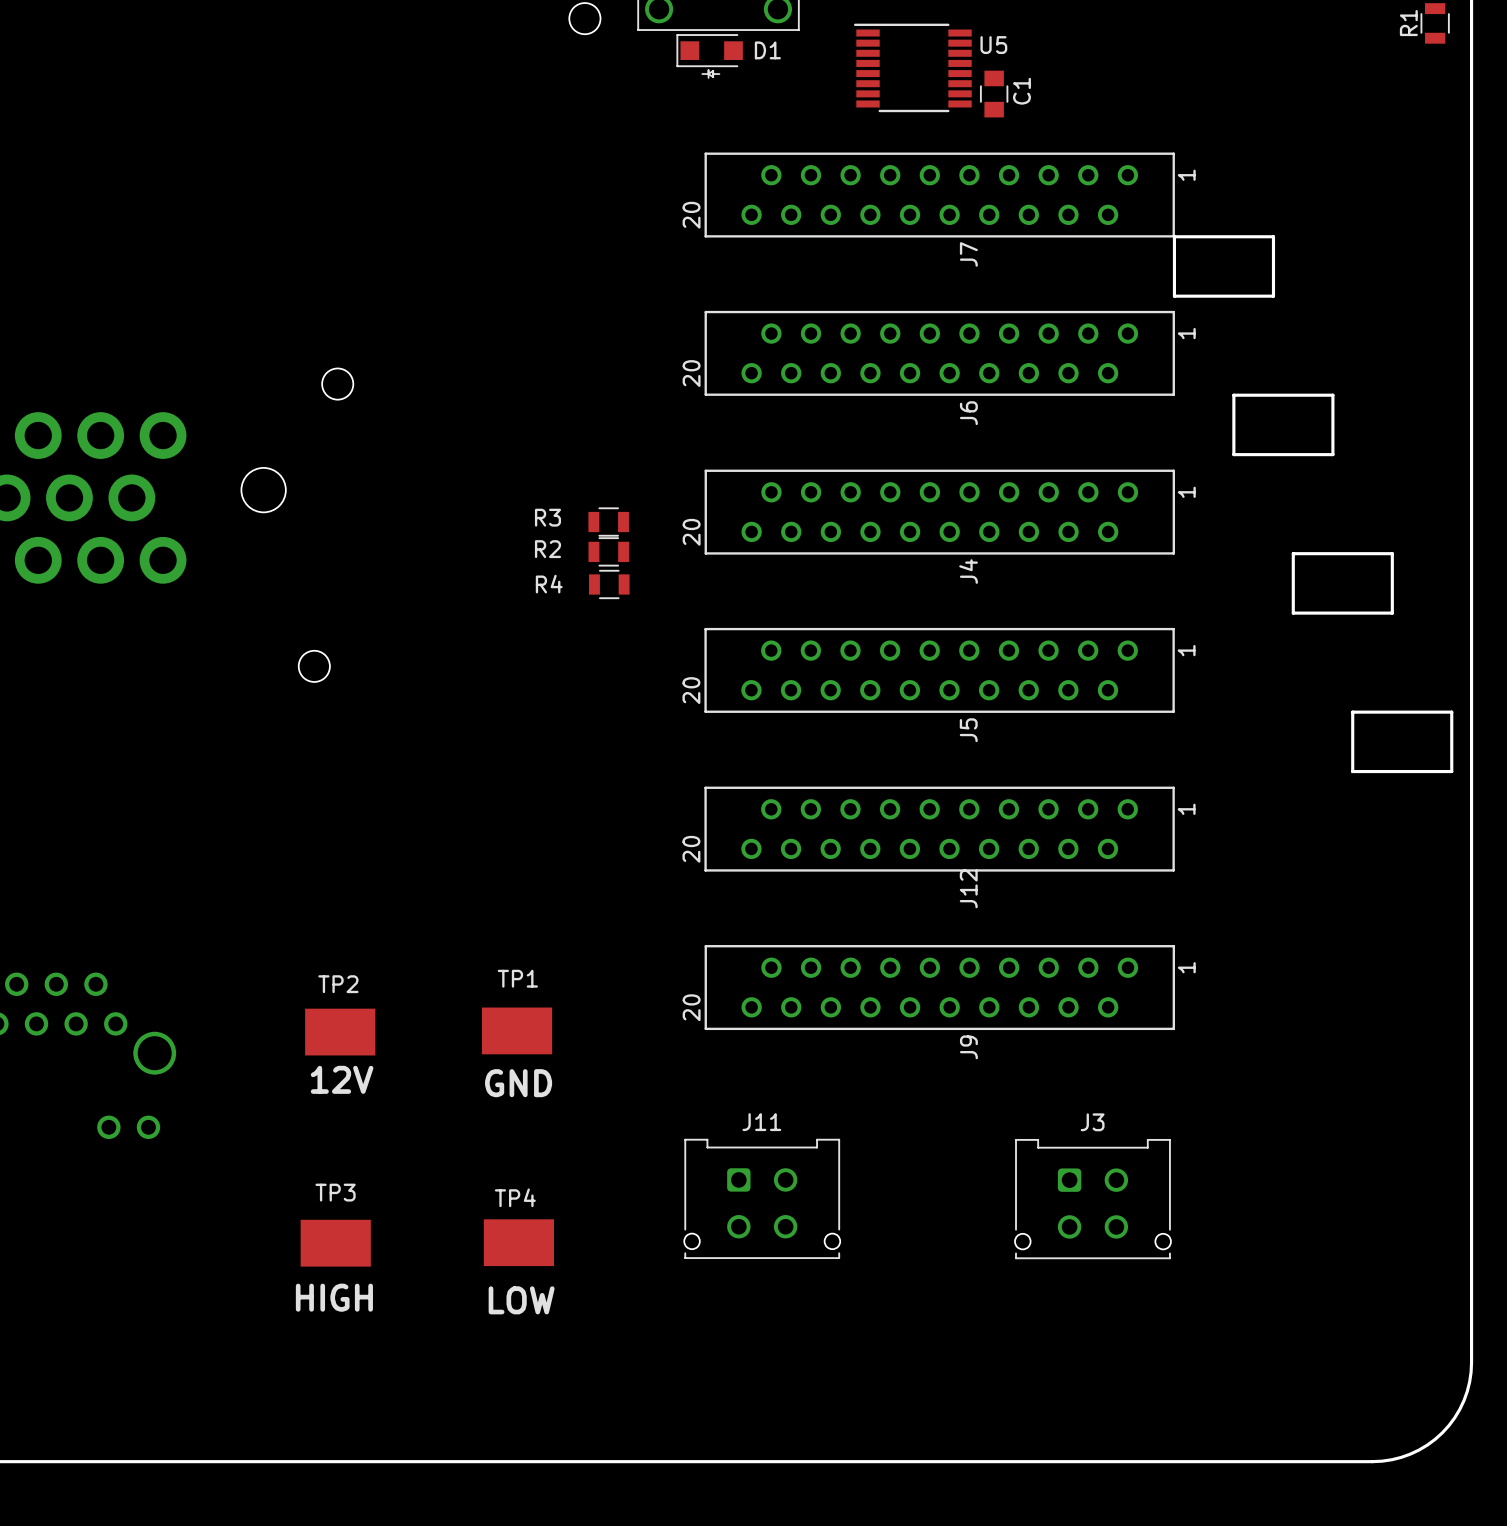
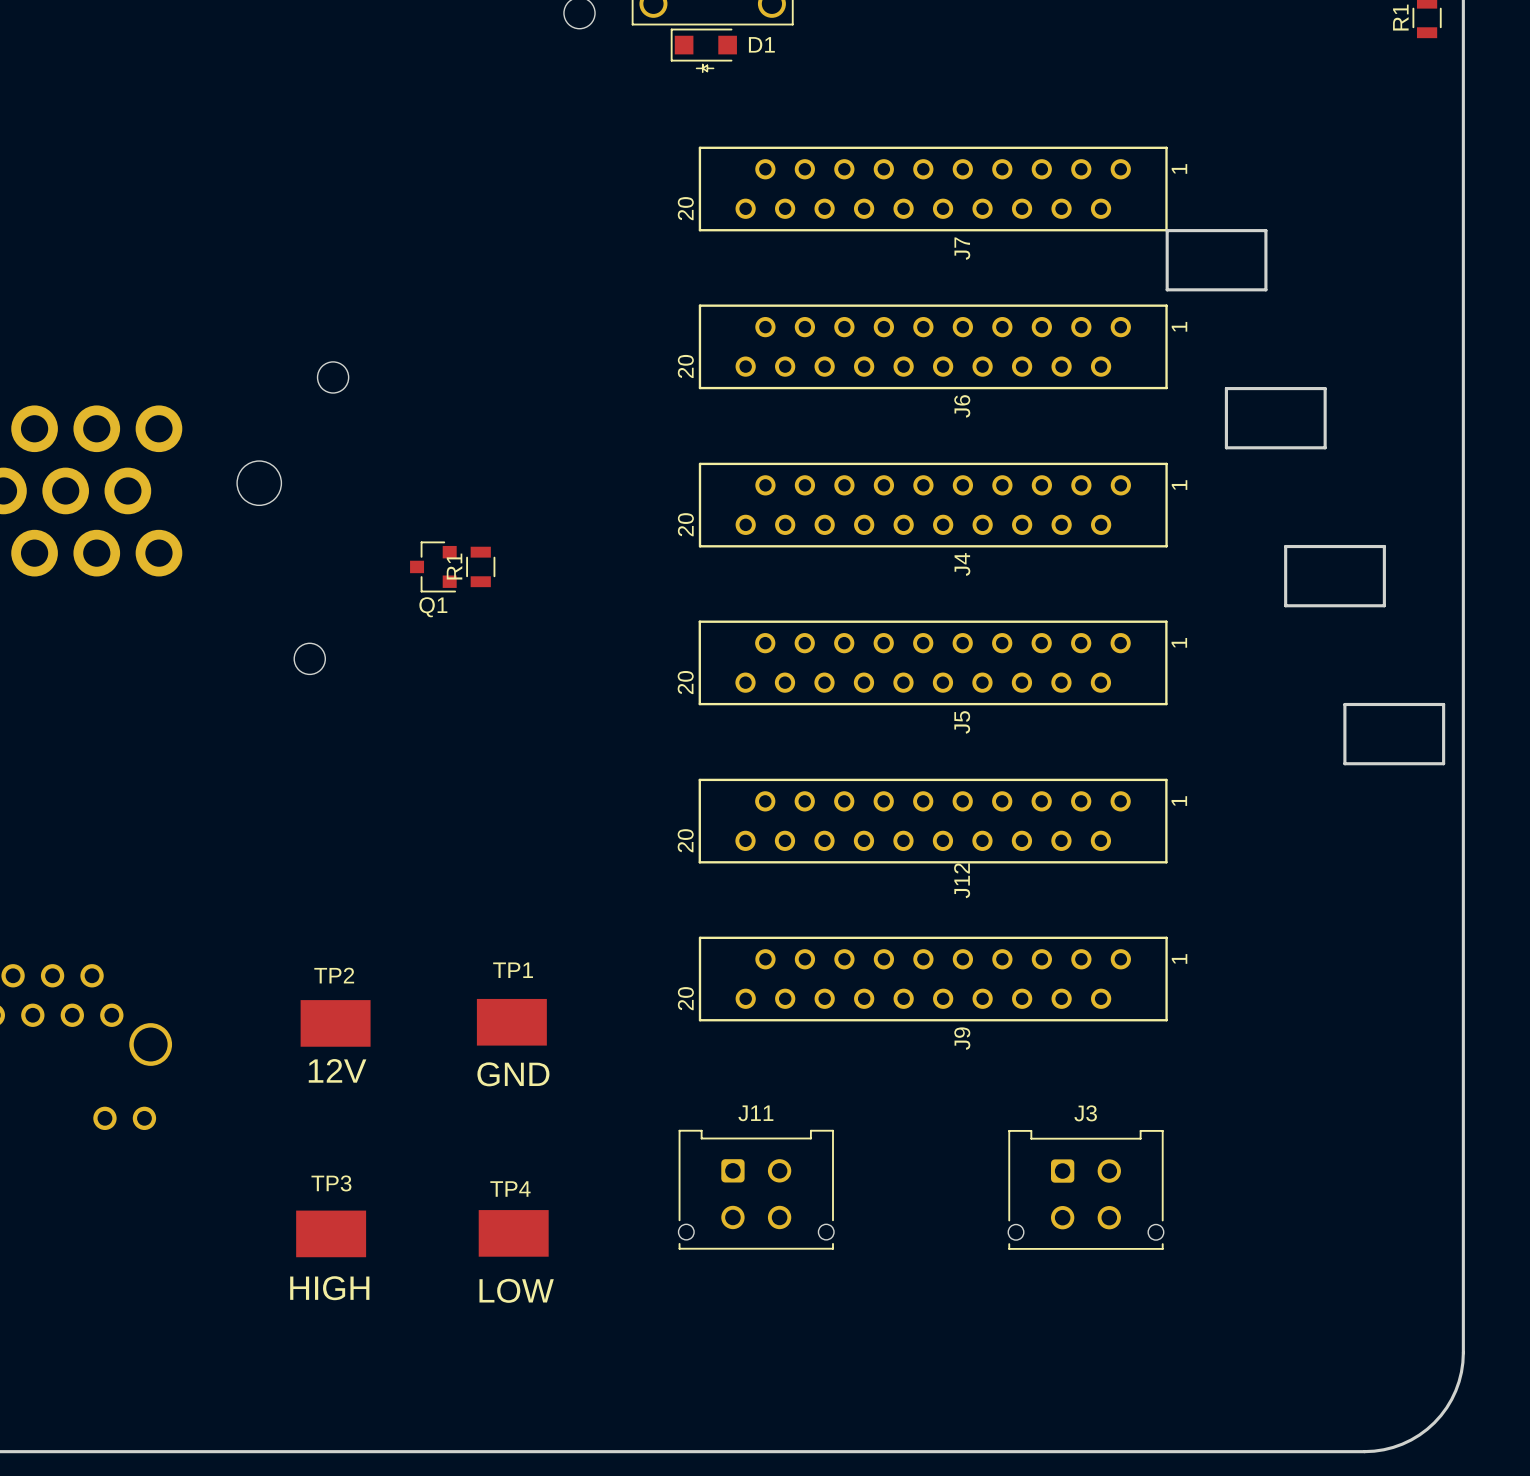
U5: (912, 67) -> none
C1: (994, 94) -> none
R2: (608, 522) -> none
R3: (608, 551) -> none
Q1: none -> (433, 566)
R1: none -> (480, 566)
R4: (609, 584) -> none

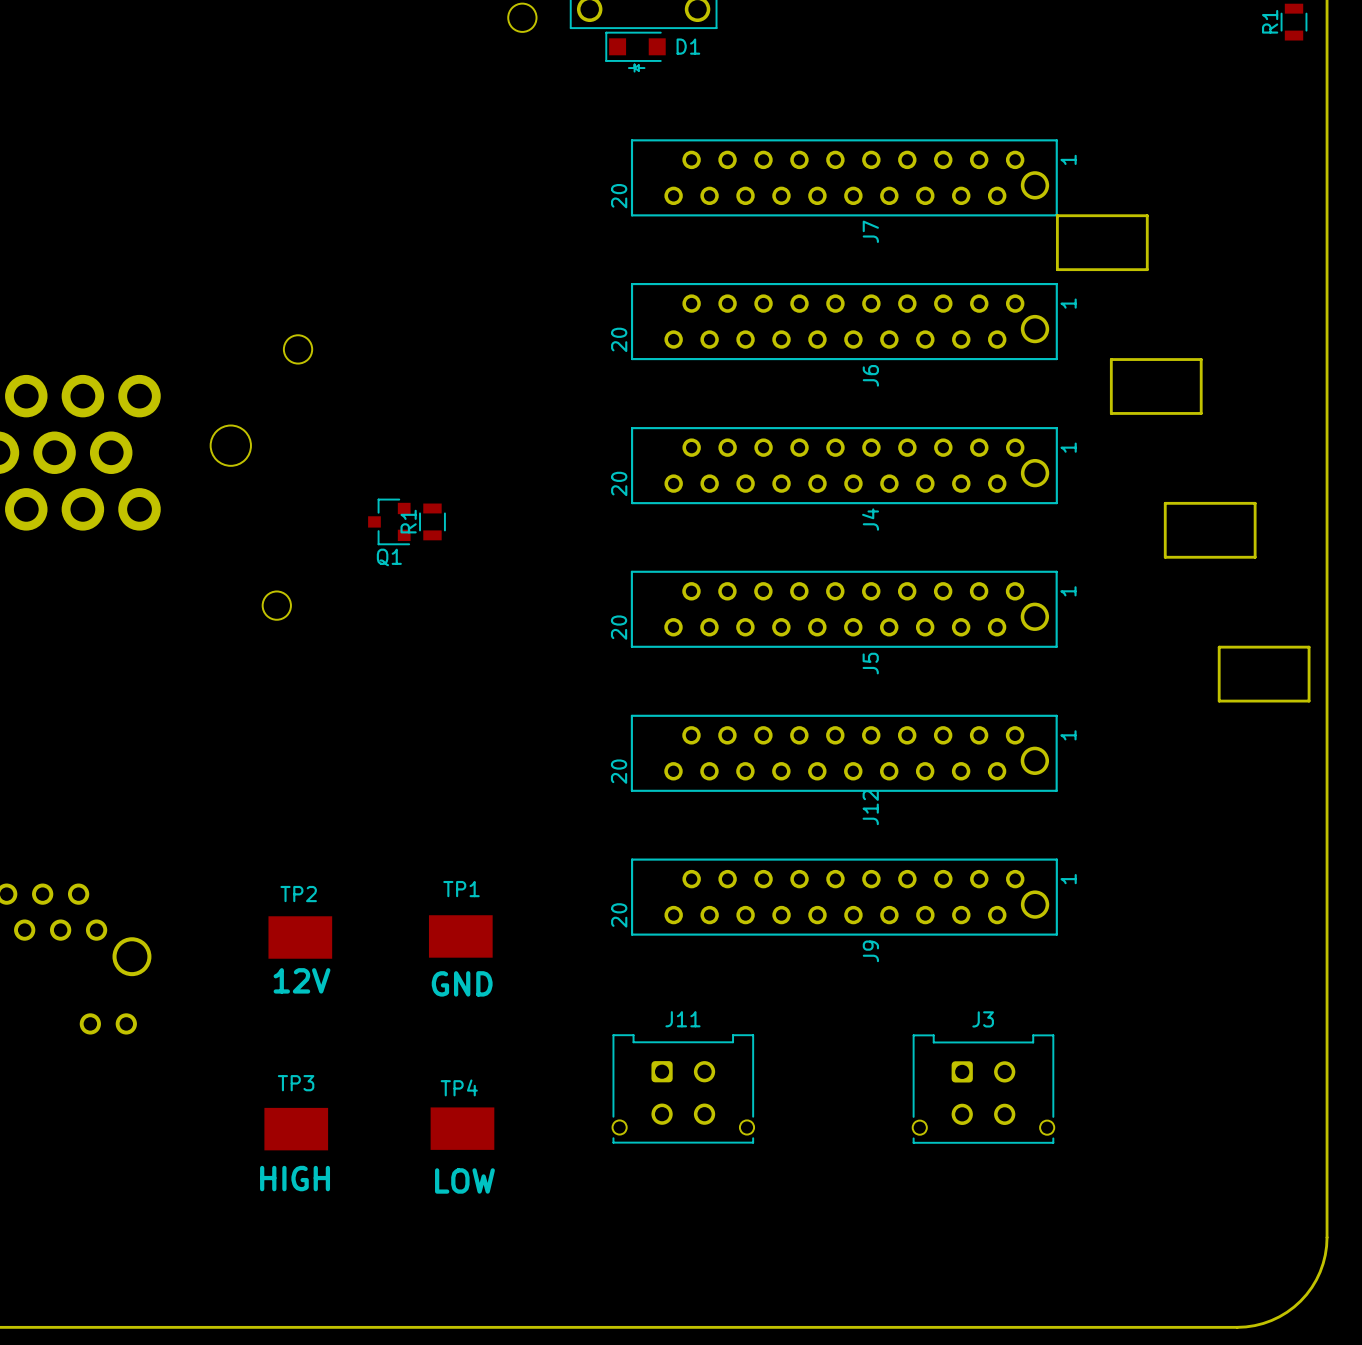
J7 footprint: [698, 146, 1168, 232] -> [630, 139, 1058, 217]
J6 footprint: [698, 304, 1168, 390] -> [630, 282, 1058, 361]
J4 footprint: [698, 462, 1168, 548] -> [631, 427, 1058, 505]
J5 footprint: [698, 620, 1168, 706] -> [630, 570, 1058, 648]
J12 footprint: [698, 778, 1168, 864] -> [630, 714, 1058, 792]
J9 footprint: [698, 936, 1168, 1022] -> [631, 858, 1058, 936]

